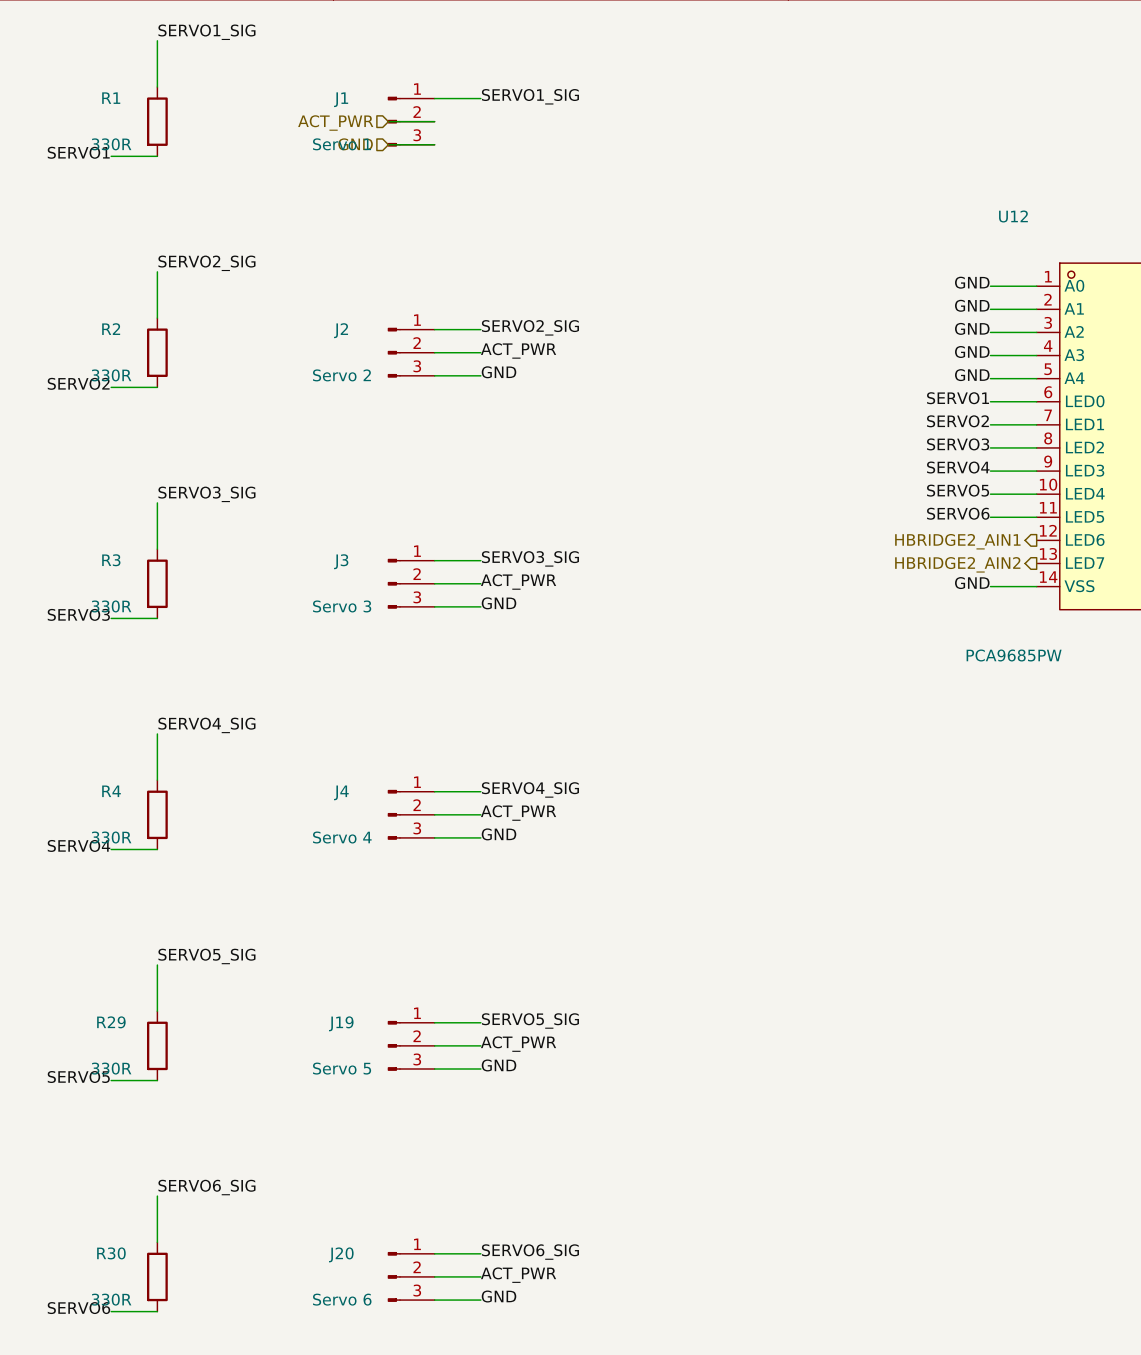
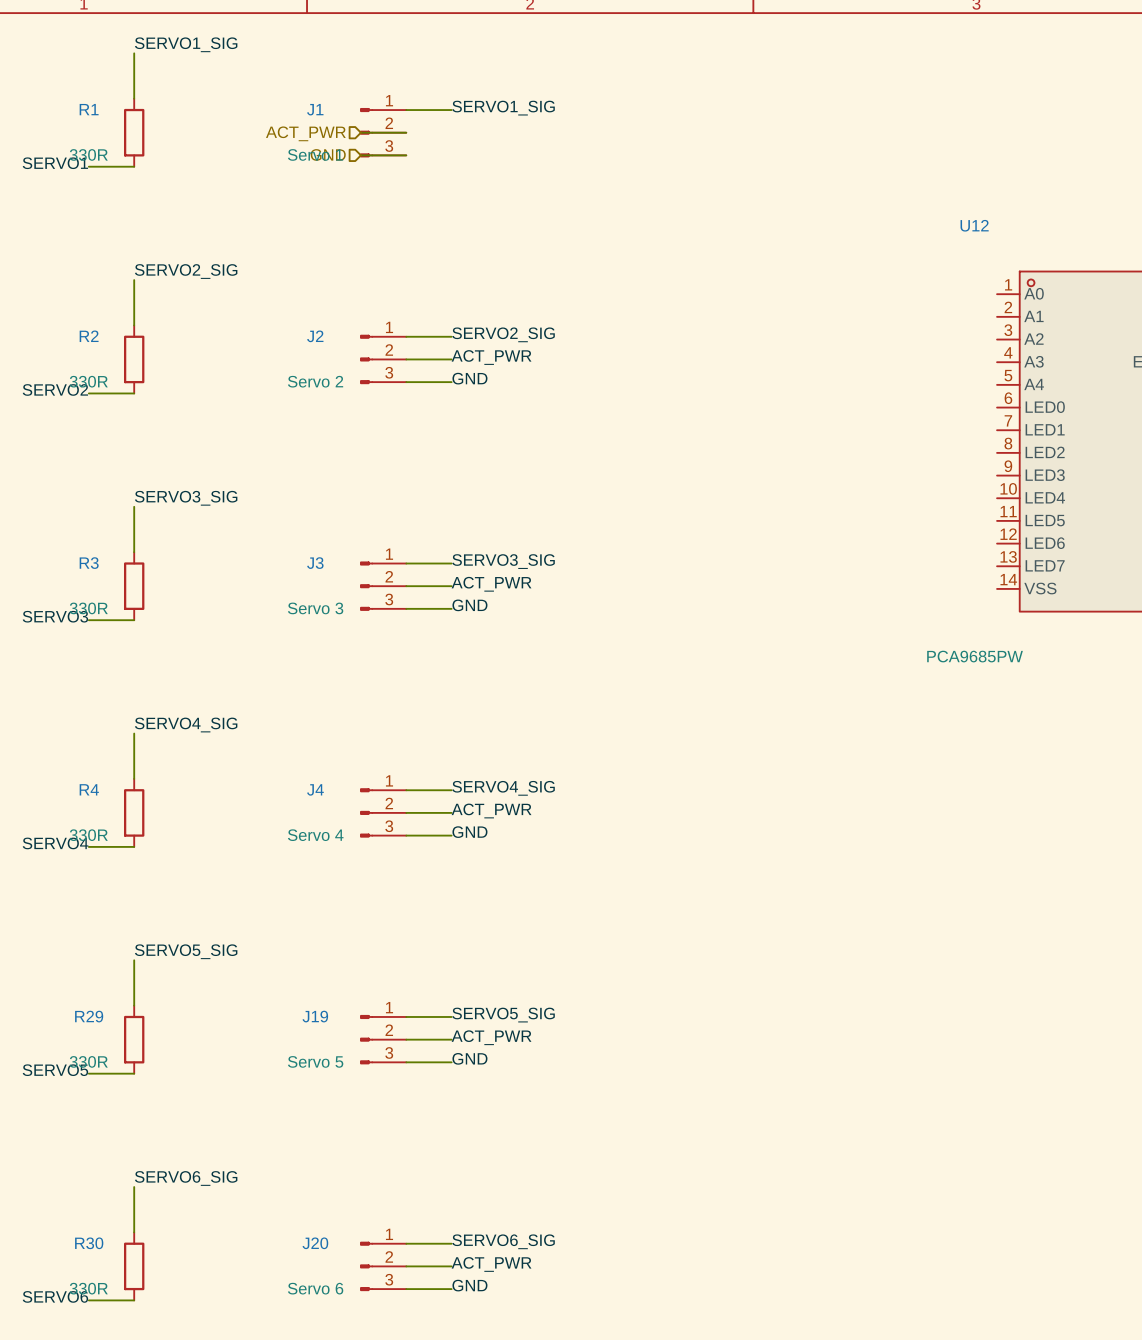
label: GND (972, 282) -> none
wire: (990, 286) (1036, 286) -> none
label: GND (972, 305) -> none
wire: (990, 309) (1036, 309) -> none
label: GND (972, 328) -> none
wire: (990, 332) (1036, 332) -> none
label: GND (972, 352) -> none
wire: (990, 355) (1036, 355) -> none
label: GND (972, 375) -> none
wire: (990, 378) (1036, 378) -> none
label: SERVO1 (958, 398) -> none
wire: (990, 401) (1036, 401) -> none
label: SERVO2 (957, 421) -> none
wire: (990, 424) (1036, 424) -> none
label: SERVO3 (958, 444) -> none
wire: (990, 447) (1036, 447) -> none
label: SERVO4 (958, 467) -> none
wire: (990, 471) (1036, 471) -> none
label: SERVO5 (958, 490) -> none
wire: (990, 494) (1036, 494) -> none
label: SERVO6 (958, 513) -> none
wire: (990, 517) (1036, 517) -> none
hierarchical label: HBRIDGE2_AIN1 (957, 541) -> none
hierarchical label: HBRIDGE2_AIN2 (957, 564) -> none
label: GND (972, 583) -> none
wire: (990, 586) (1036, 586) -> none

